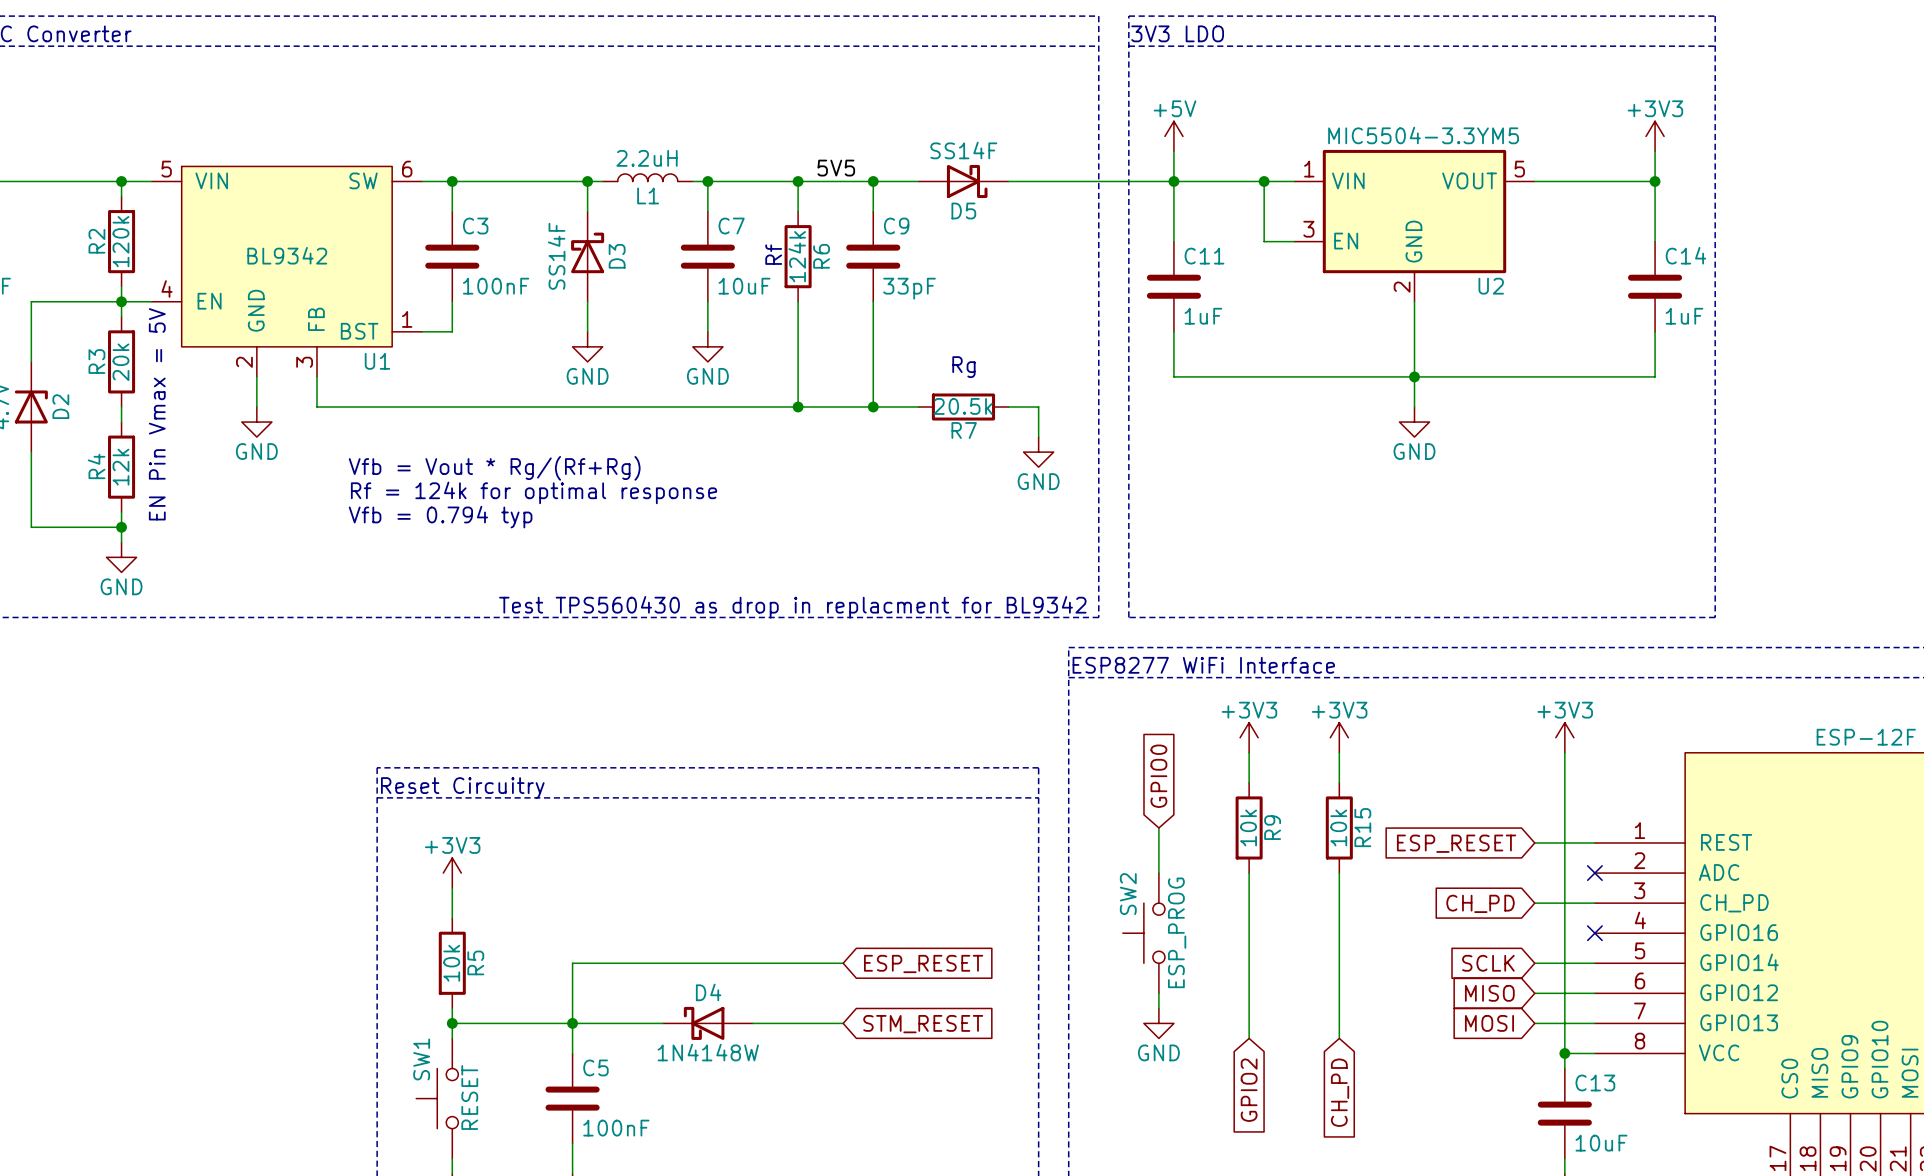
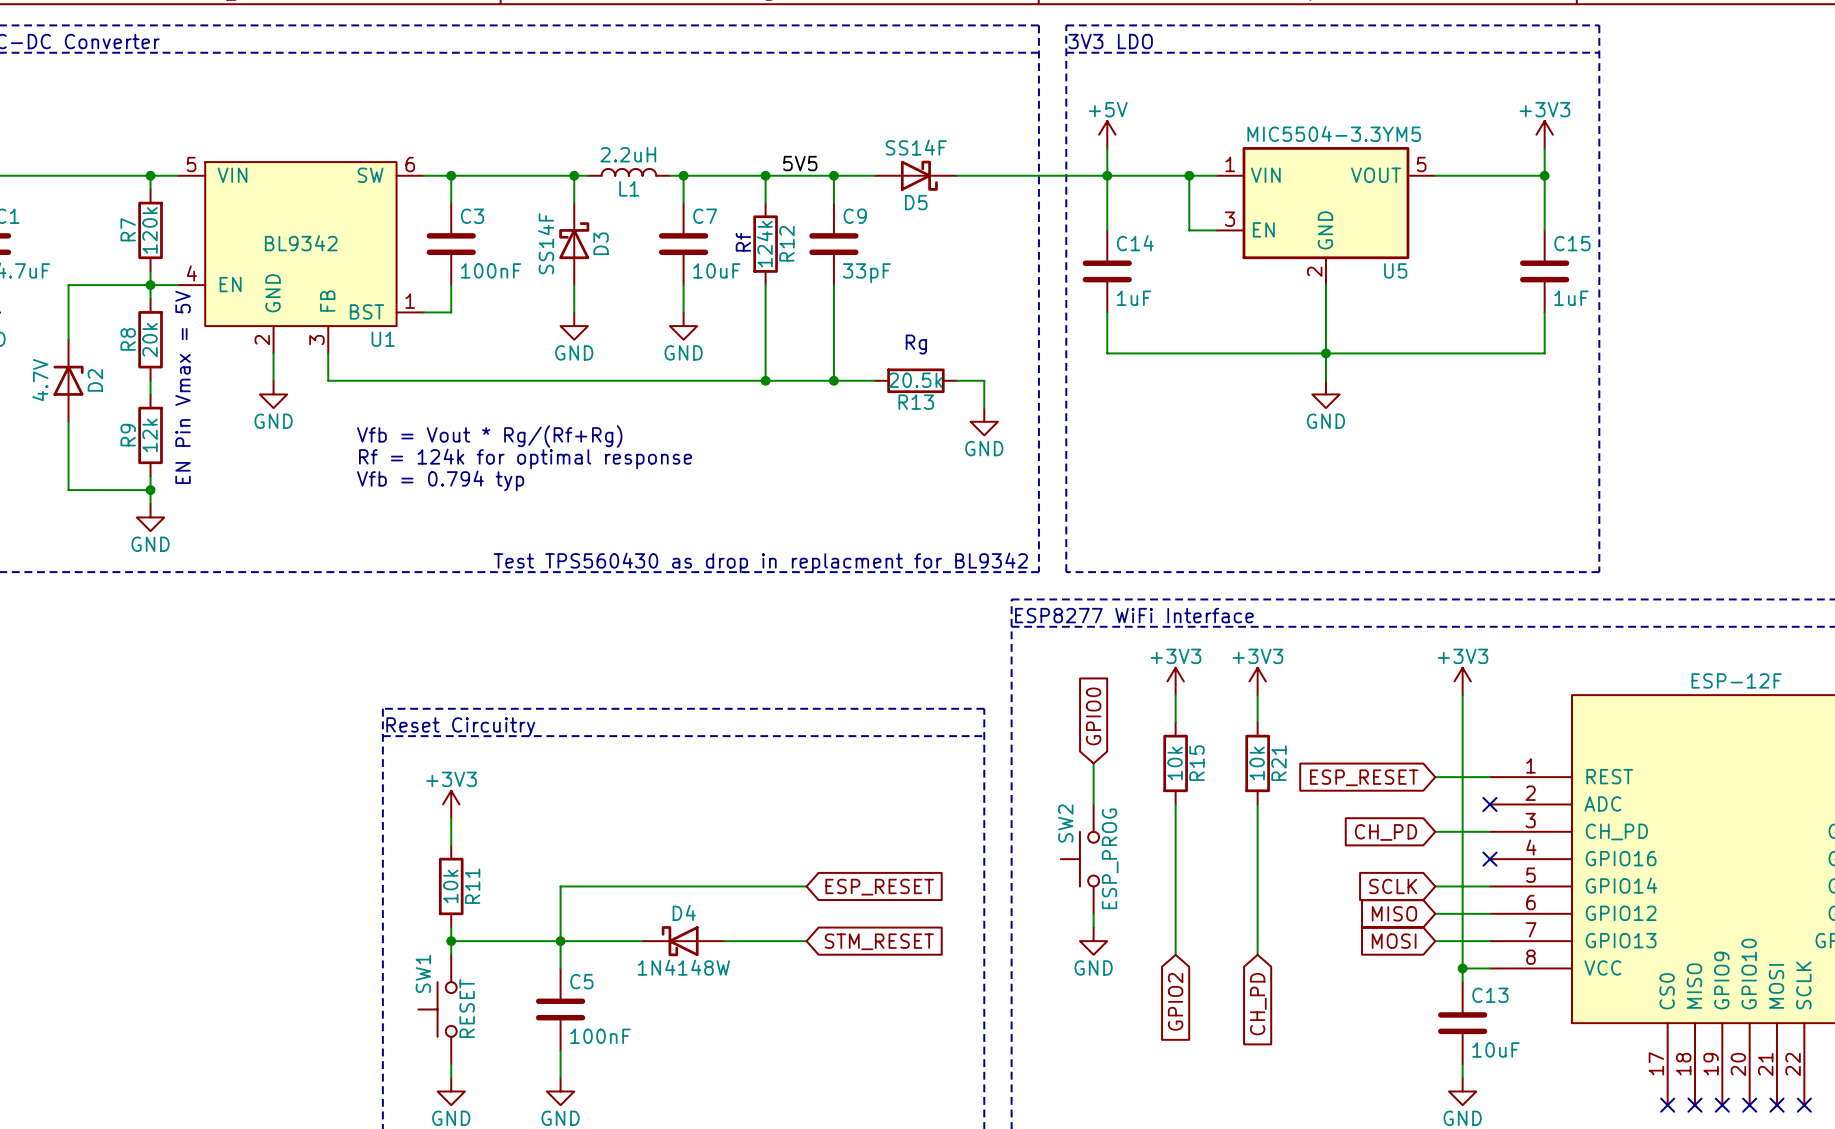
R2 name: R2 (96, 241) -> R7 (128, 229)
C14 name: C14 (1685, 255) -> C15 (1572, 243)
R6 name: R6 (821, 256) -> R12 (786, 243)
C11 name: C11 (1204, 256) -> C14 (1135, 243)
U2 name: U2 (1491, 286) -> U5 (1395, 270)
R3 name: R3 (96, 361) -> R8 (128, 339)
R7 name: R7 (964, 430) -> R13 (916, 402)
R4 name: R4 (96, 466) -> R9 (128, 435)
R9 name: R9 (1272, 827) -> R15 (1196, 763)
R15 name: R15 (1362, 827) -> R21 (1278, 763)
R5 name: R5 (475, 962) -> R11 (472, 886)

